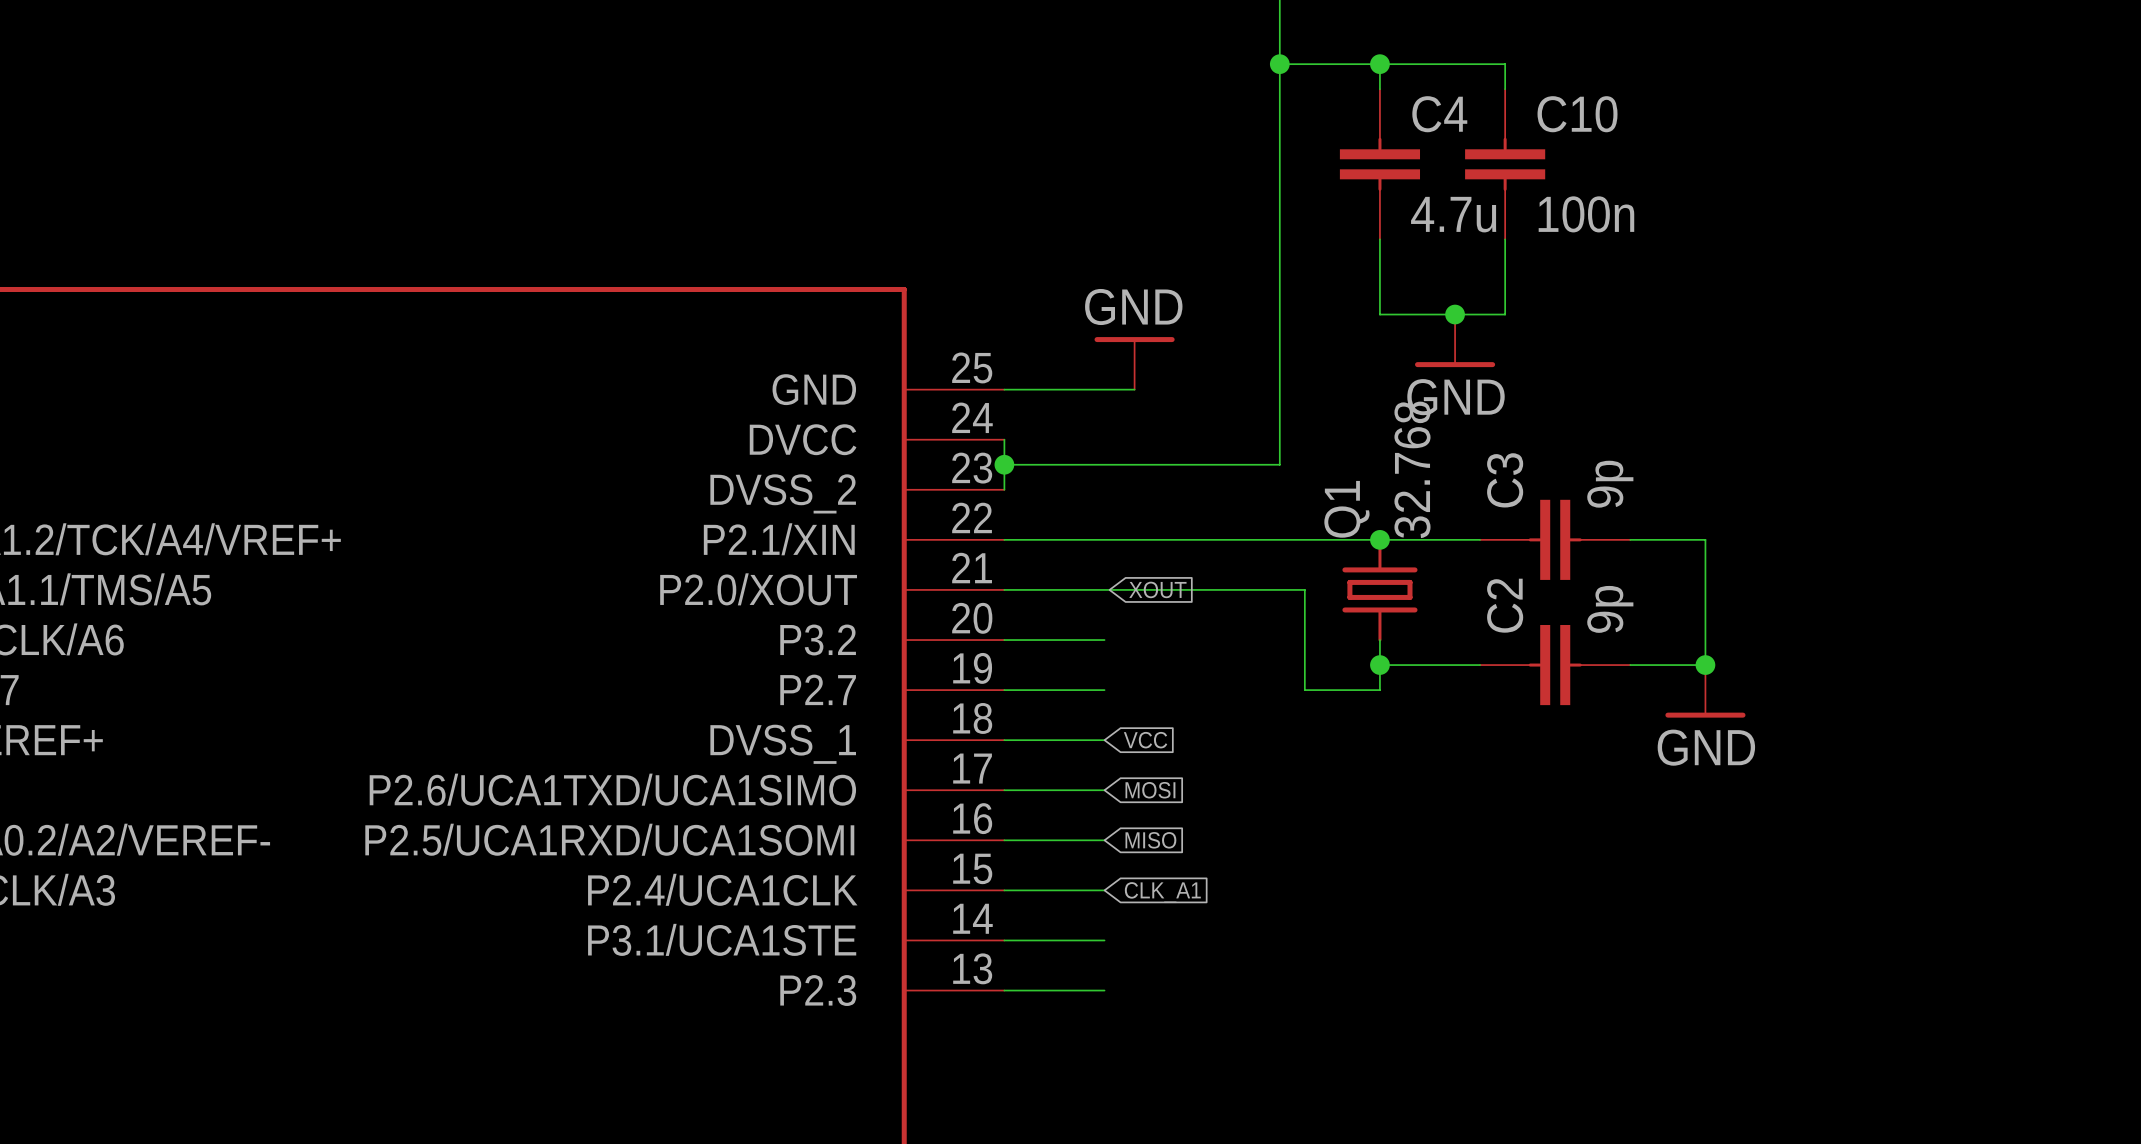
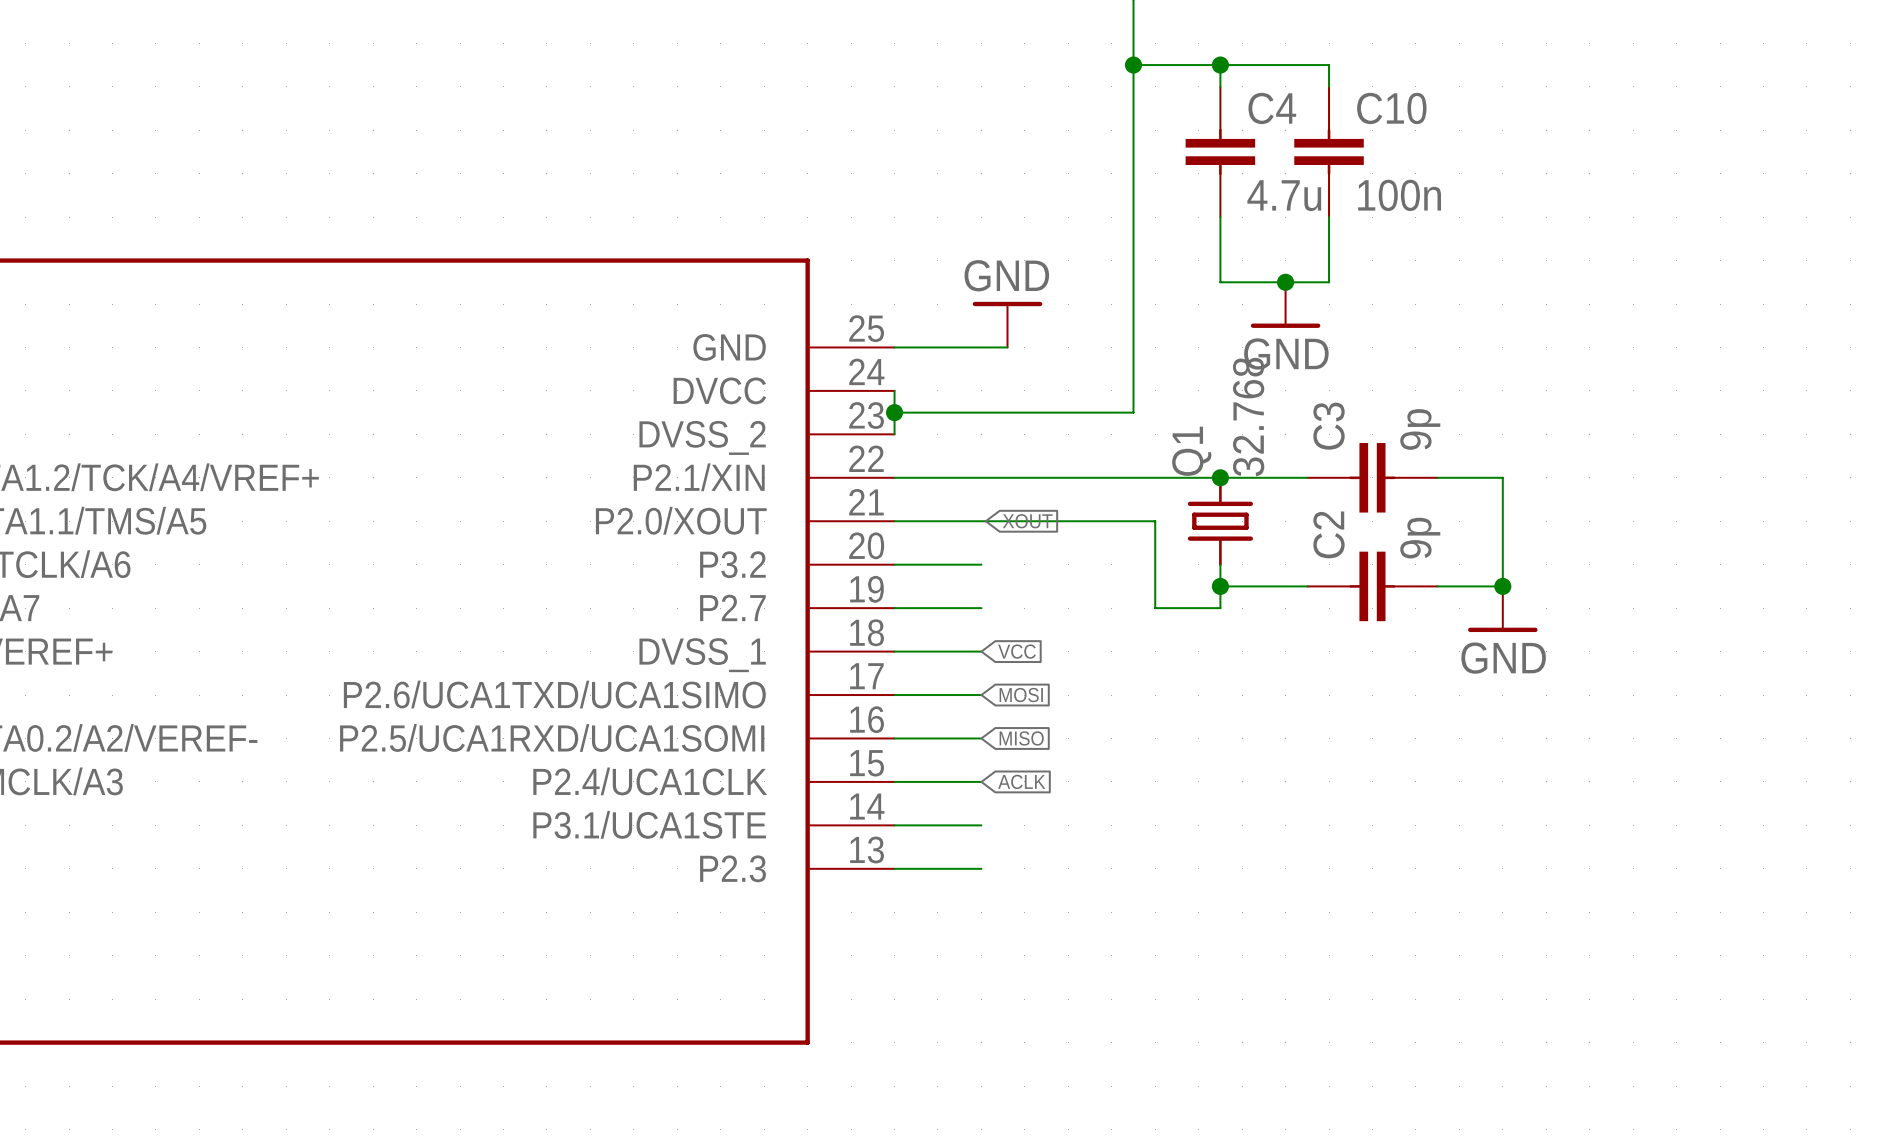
global label: CLK_A1 (1162, 892) -> ACLK (1021, 781)

